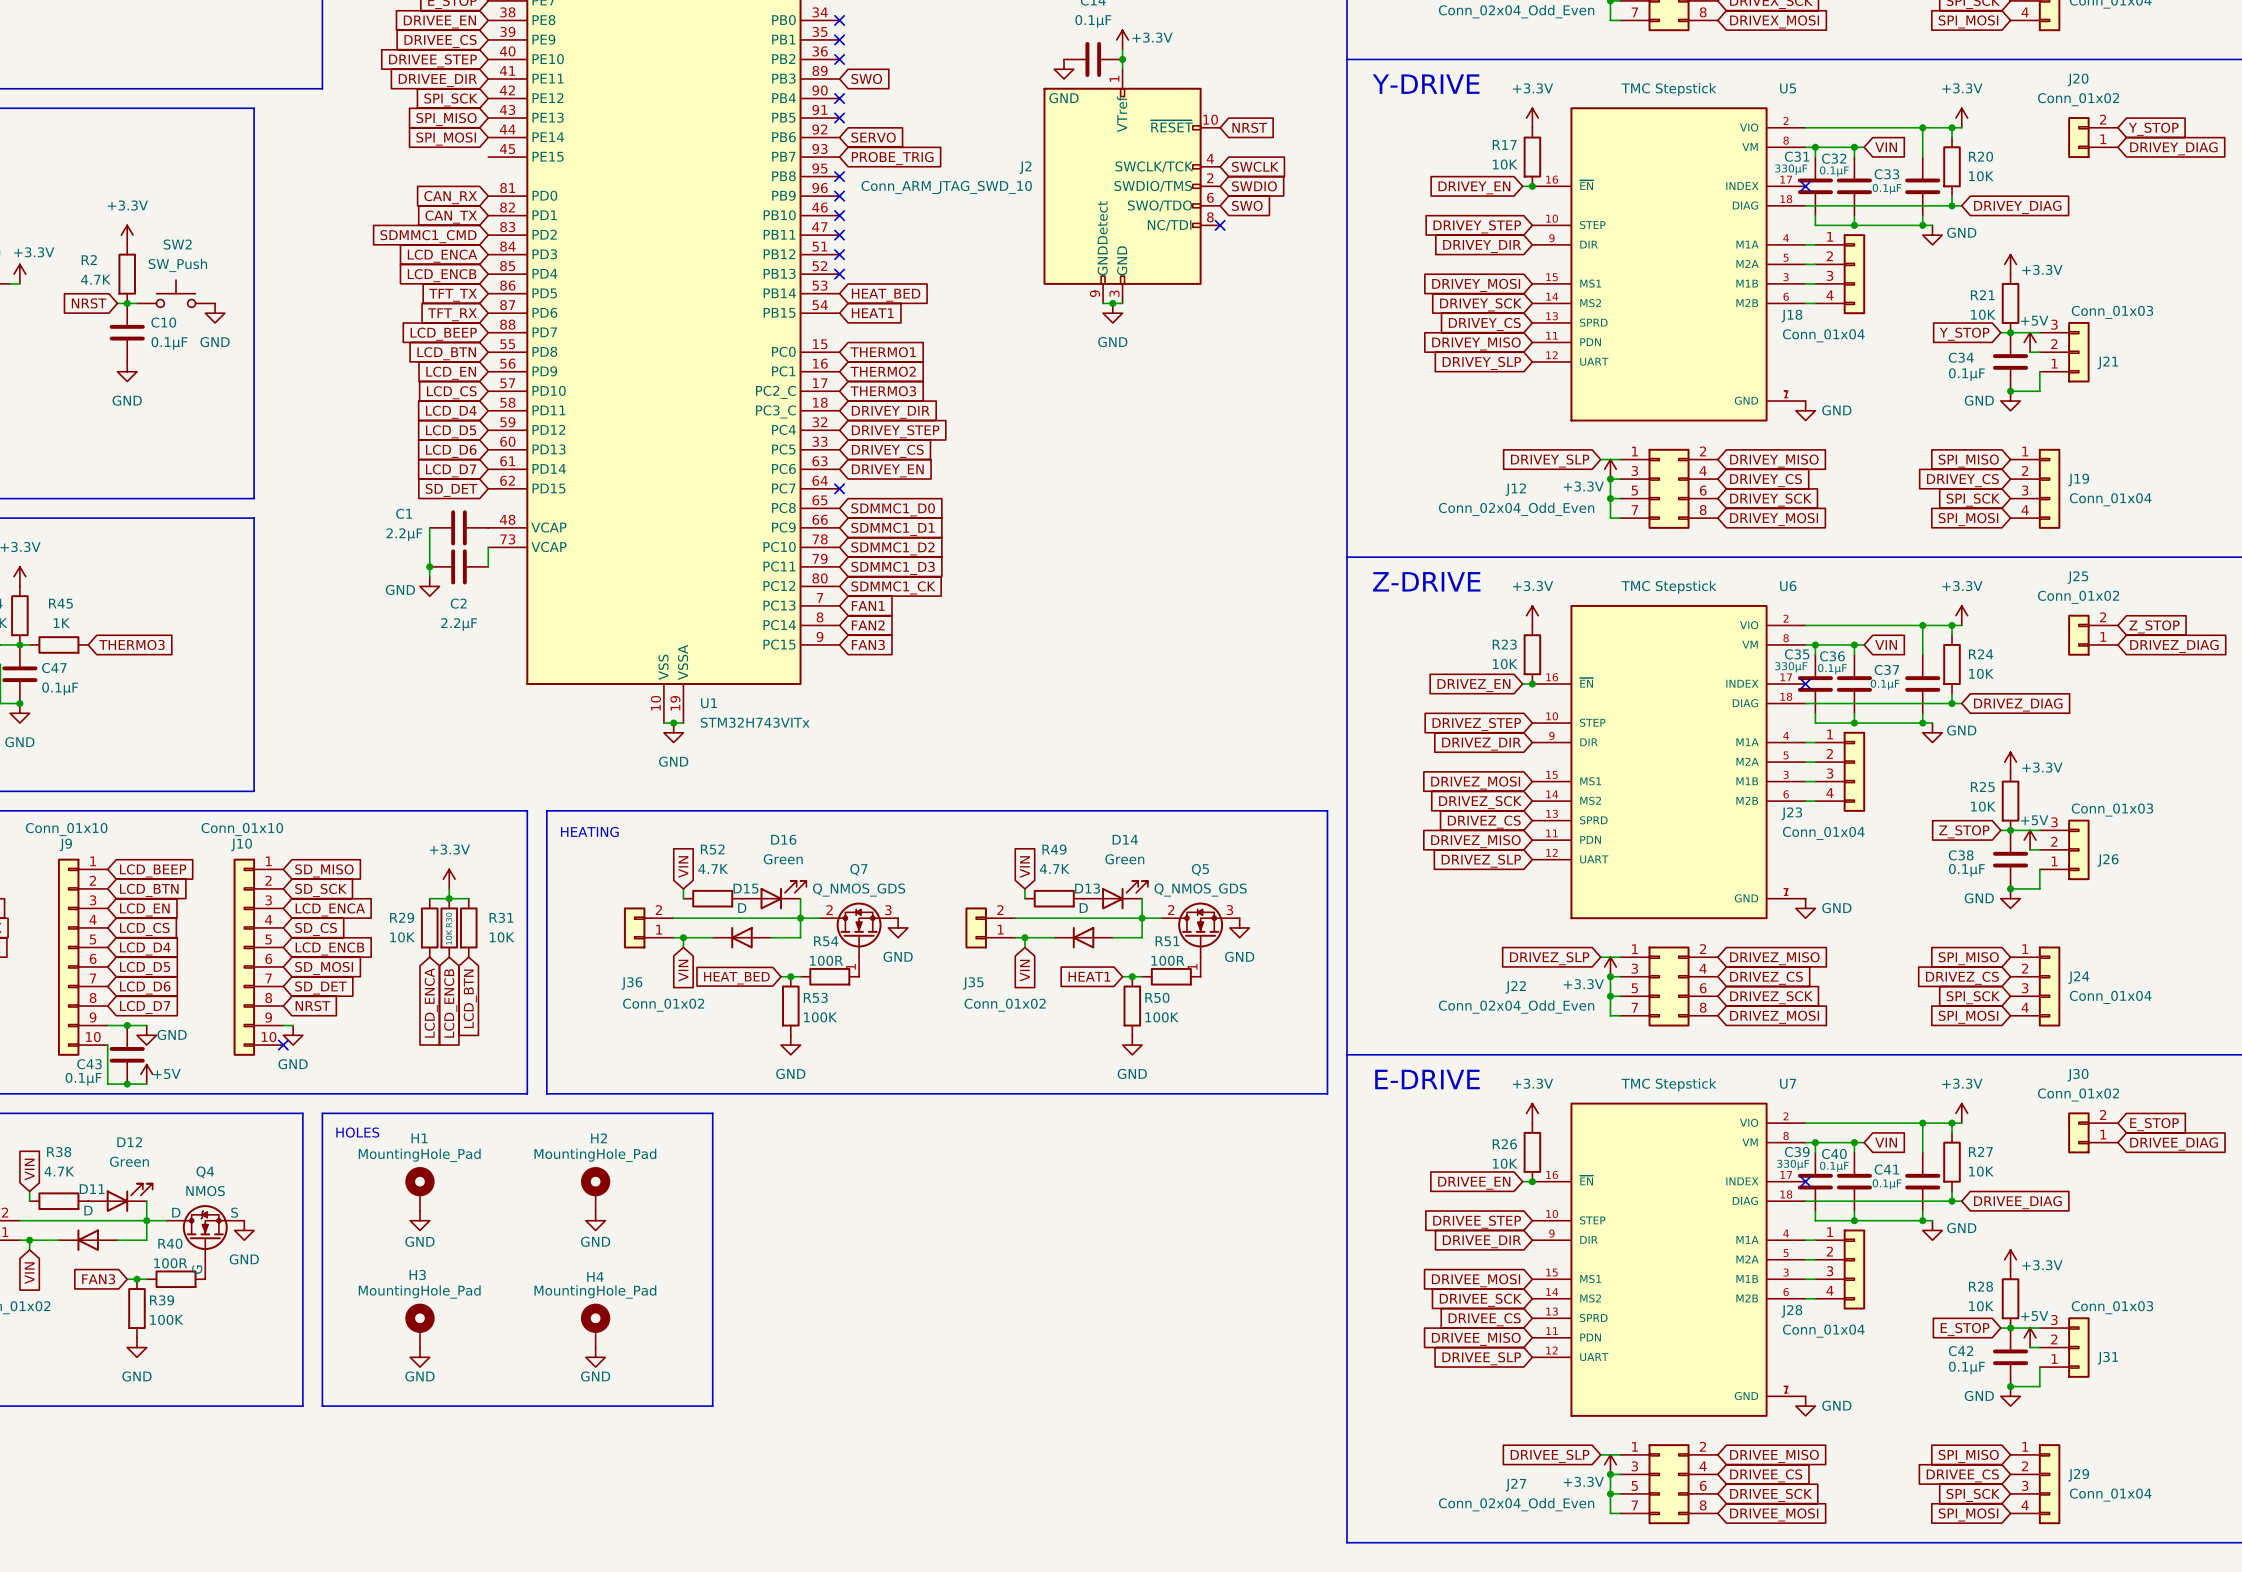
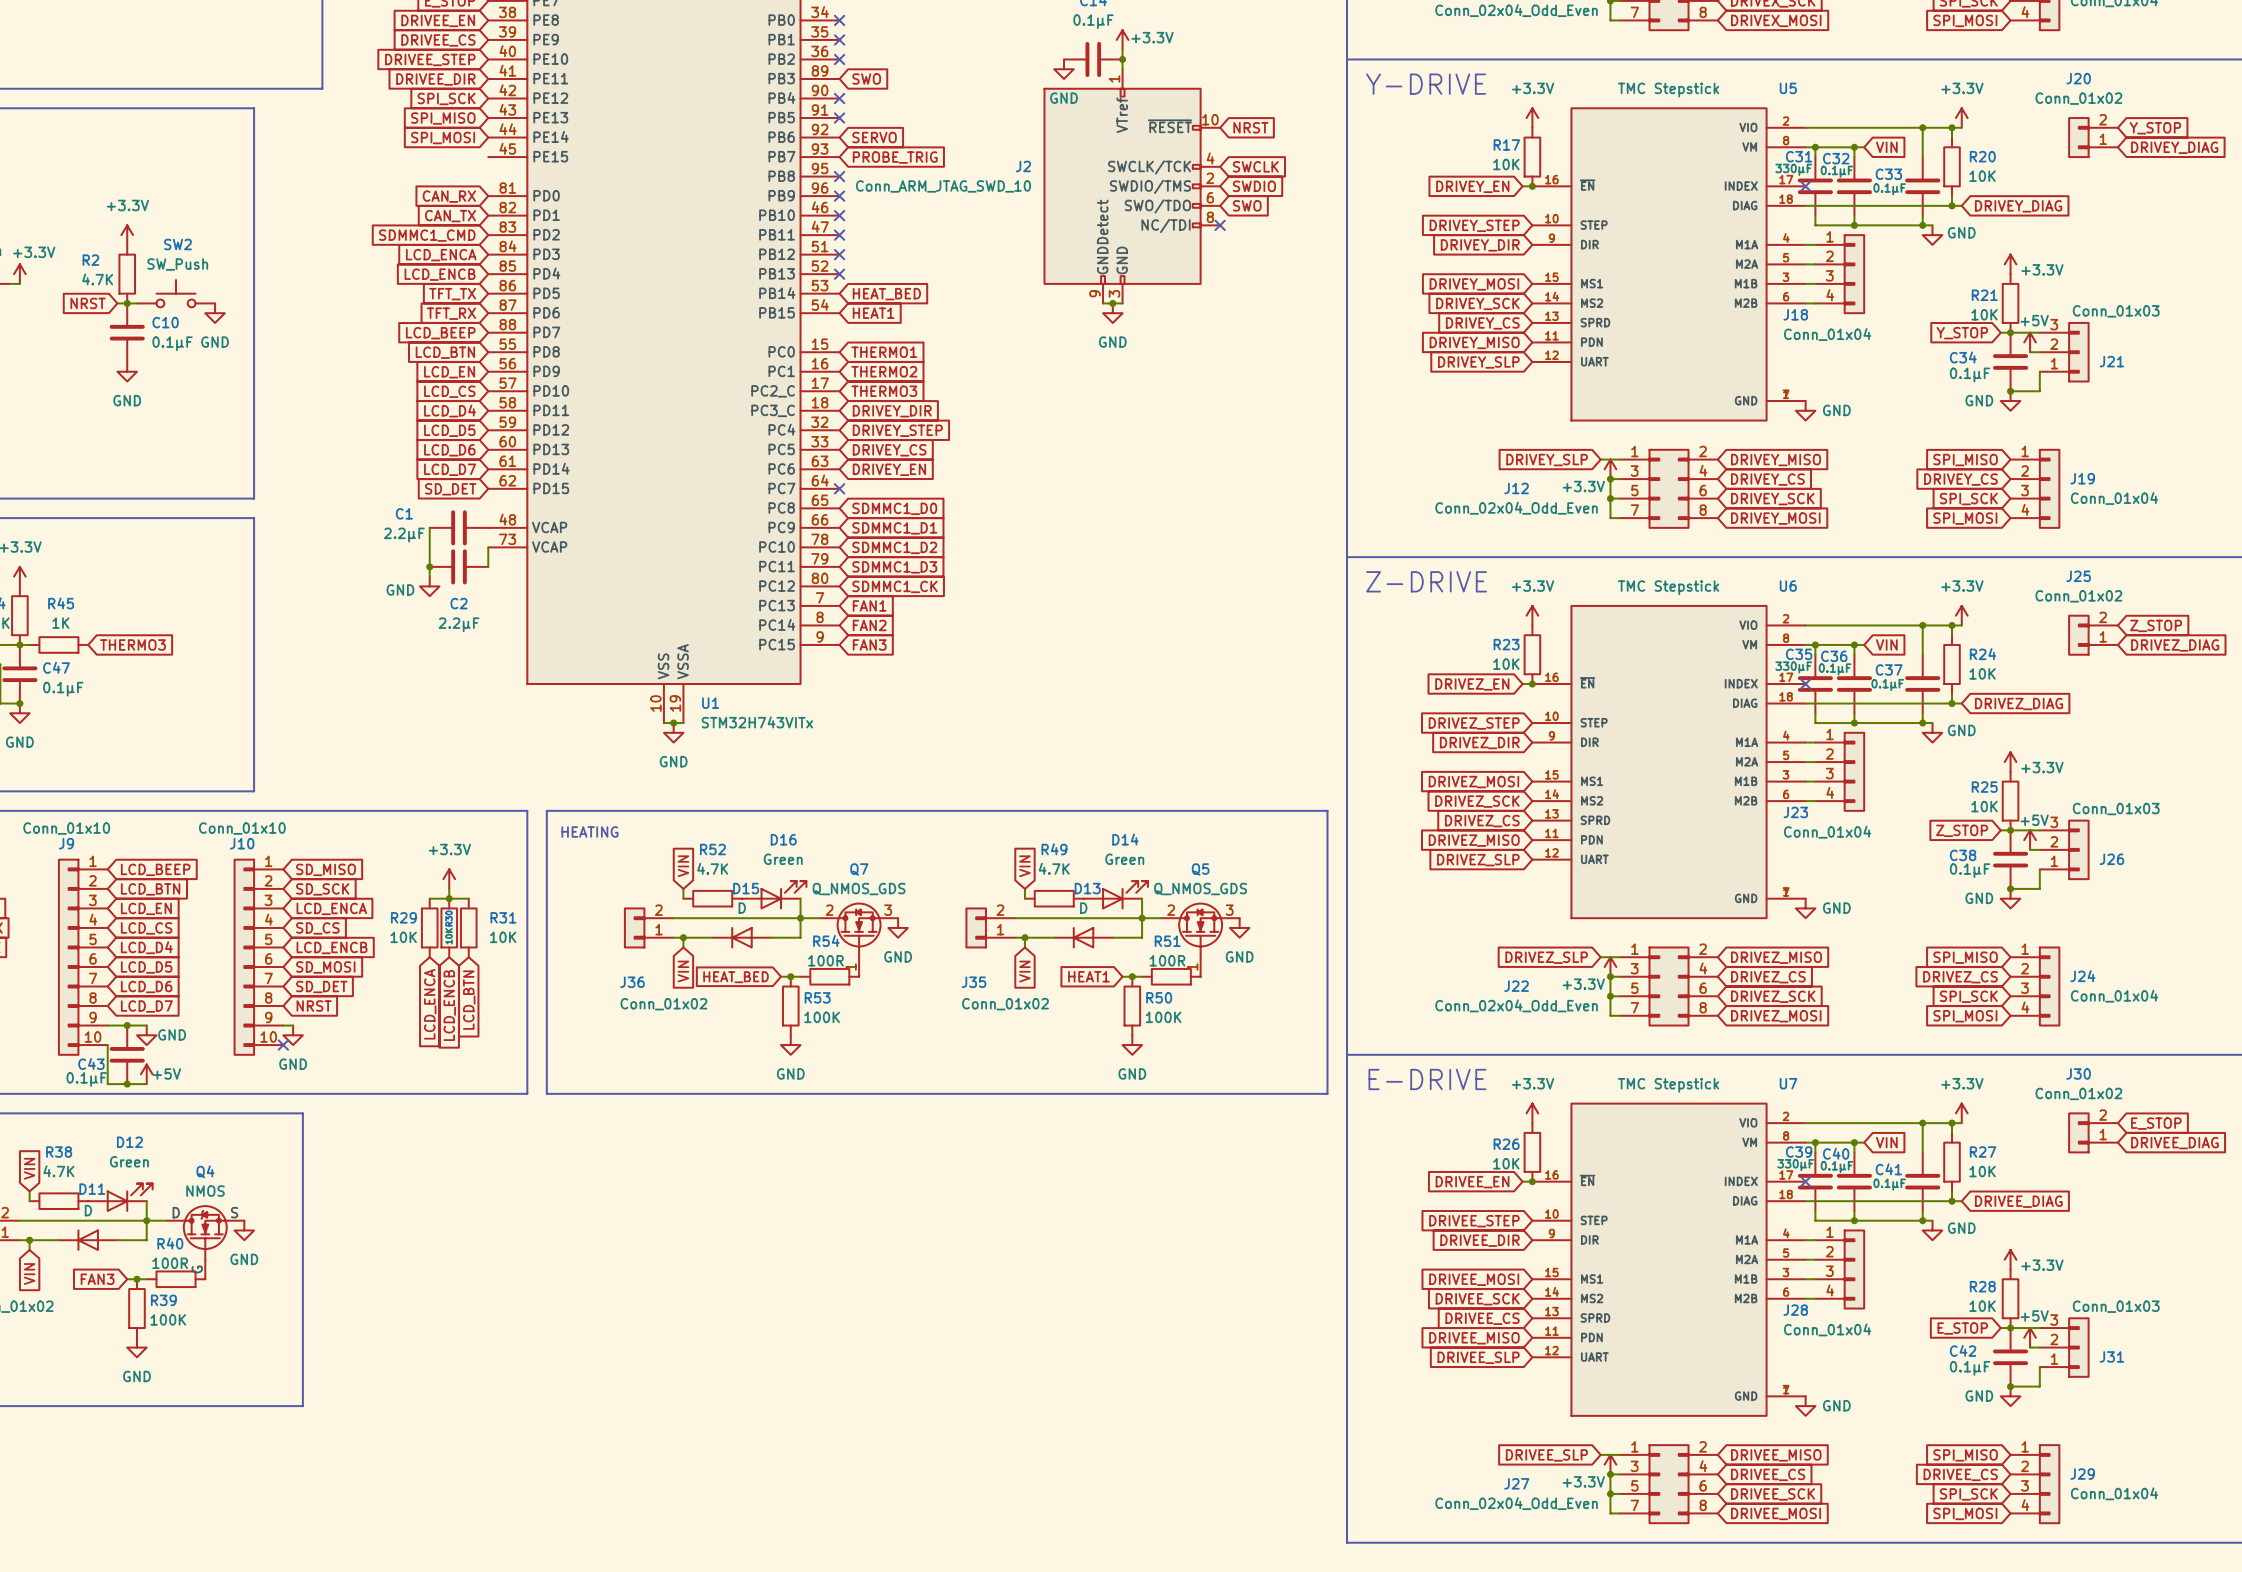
line: (322, 1113) (712, 1113) (712, 1406) (322, 1406) (322, 1113) -> none
text: HOLES (357, 1132) -> none
H1: MountingHole_Pad (419, 1188) -> none
H2: MountingHole_Pad (595, 1188) -> none
power symbol: GND (419, 1220) -> none
power symbol: GND (595, 1220) -> none
H3: MountingHole_Pad (419, 1325) -> none
H4: MountingHole_Pad (595, 1325) -> none
power symbol: GND (419, 1357) -> none
power symbol: GND (595, 1357) -> none

